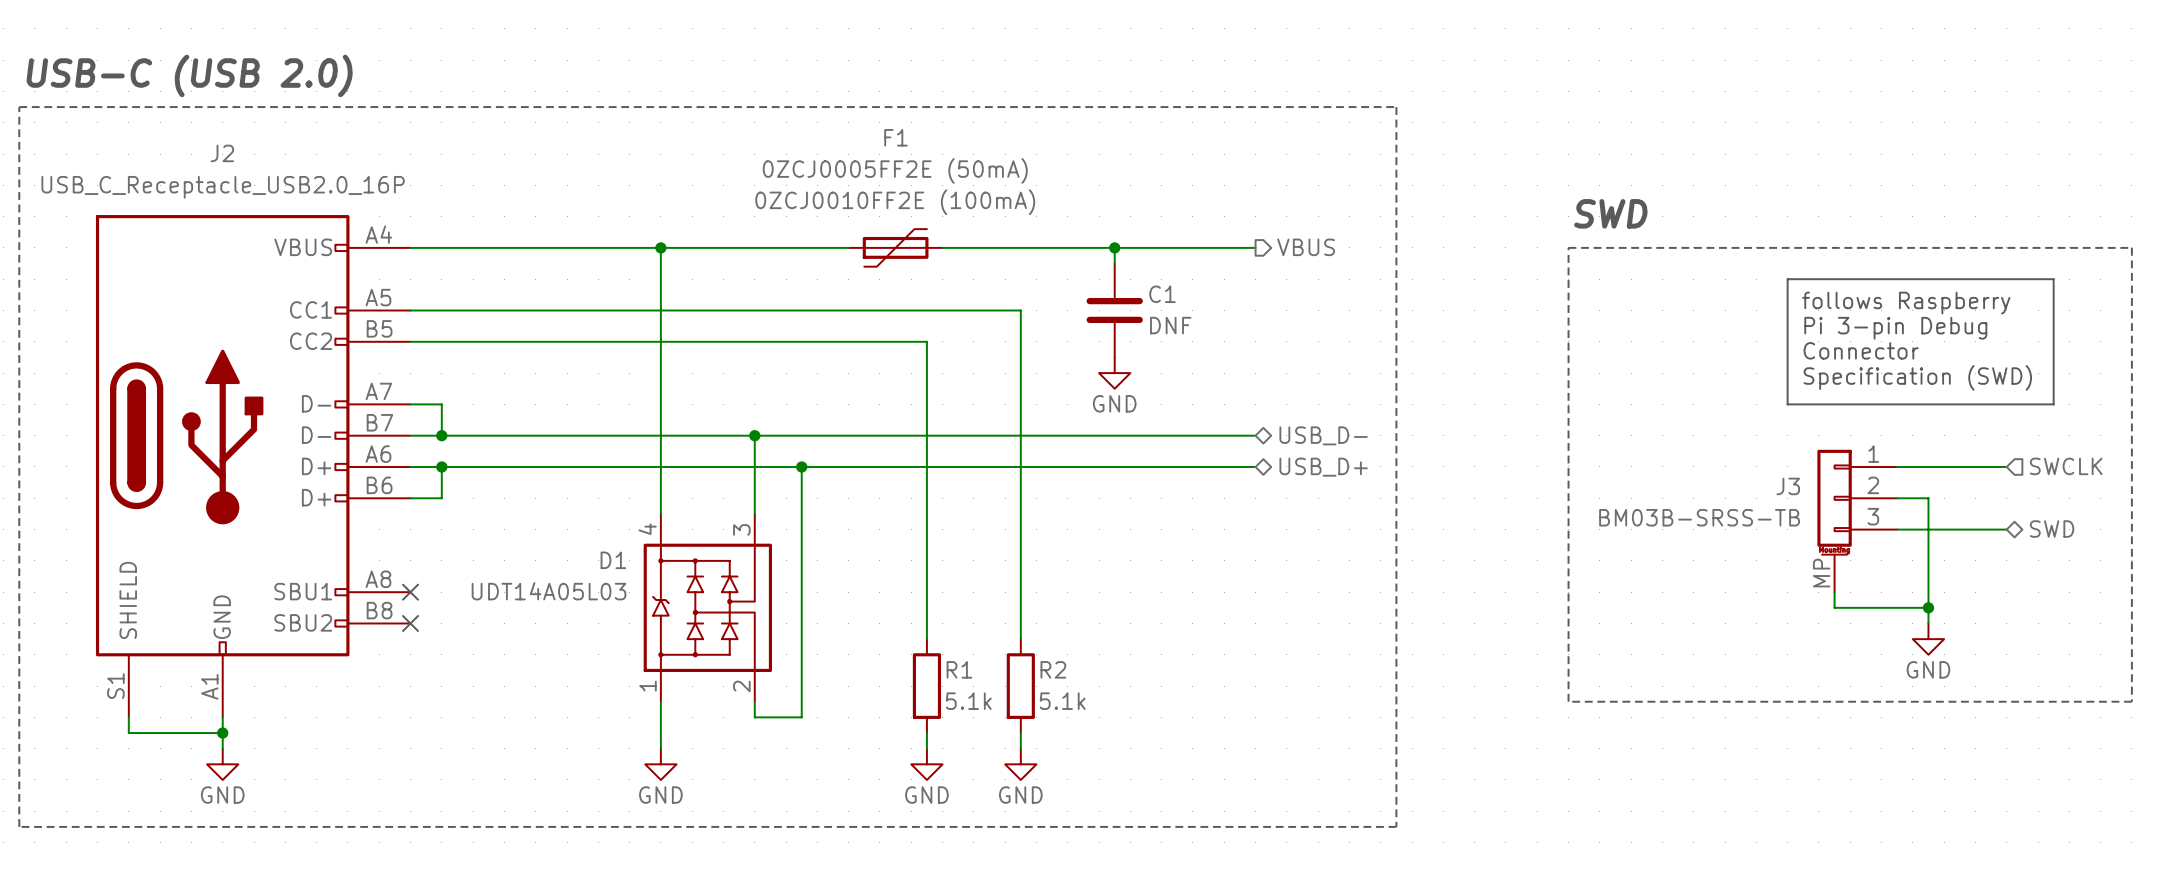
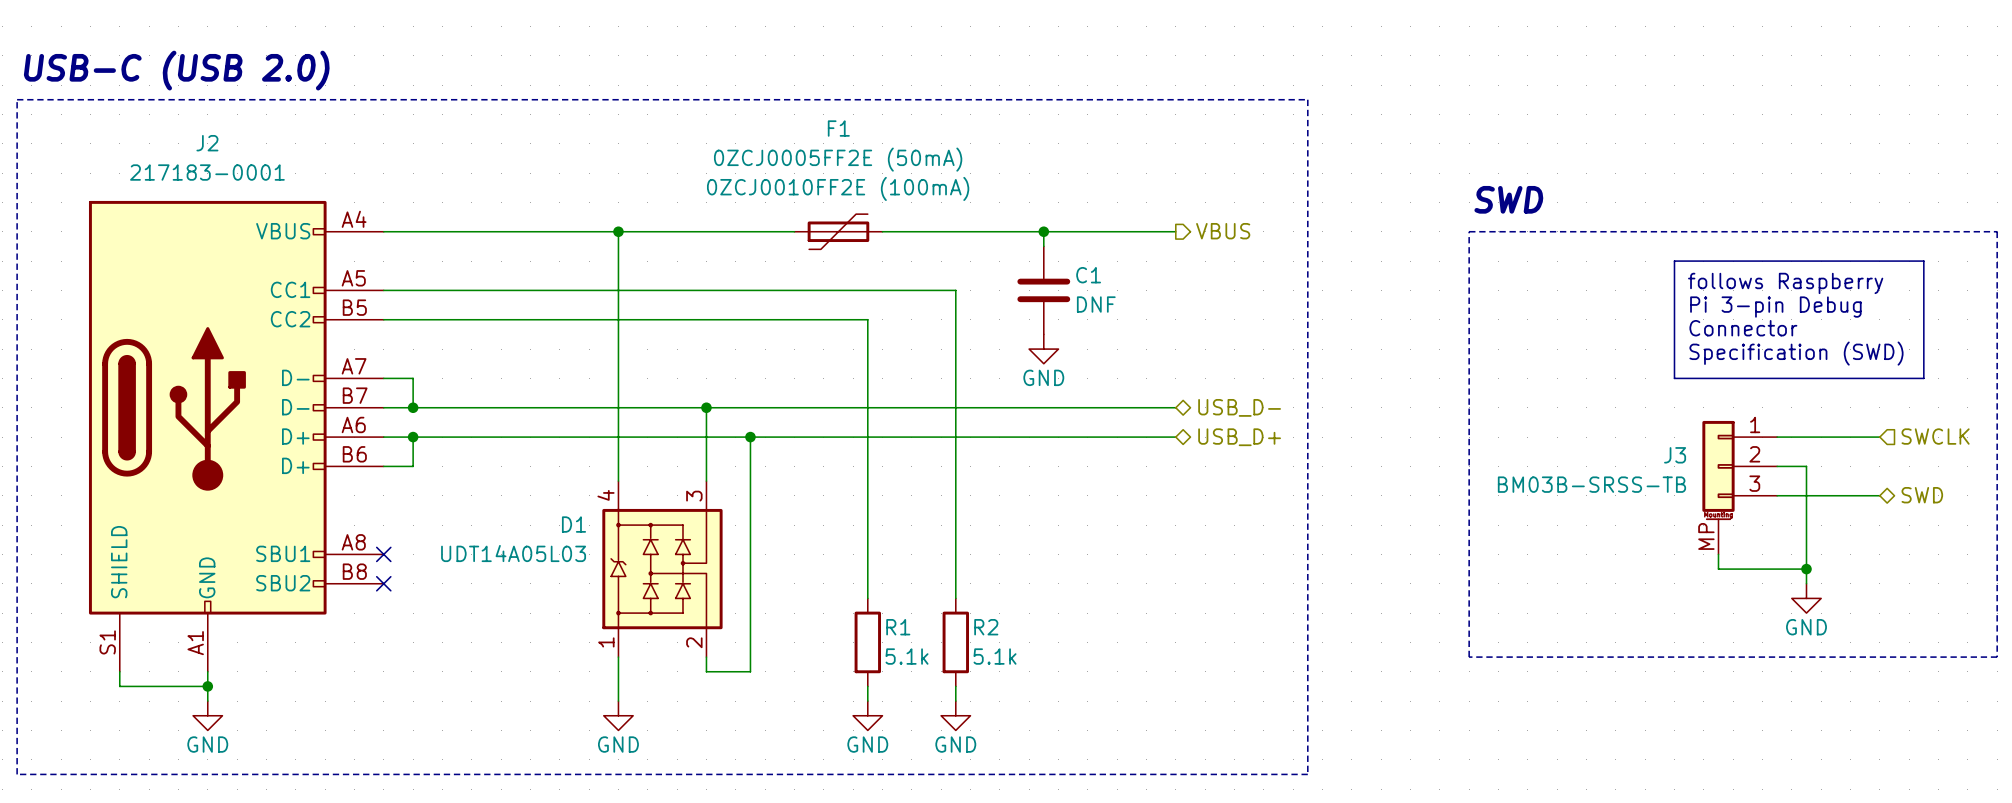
J2 value: USB_C_Receptacle_USB2.0_16P (223, 187) -> 217183-0001 (207, 172)

